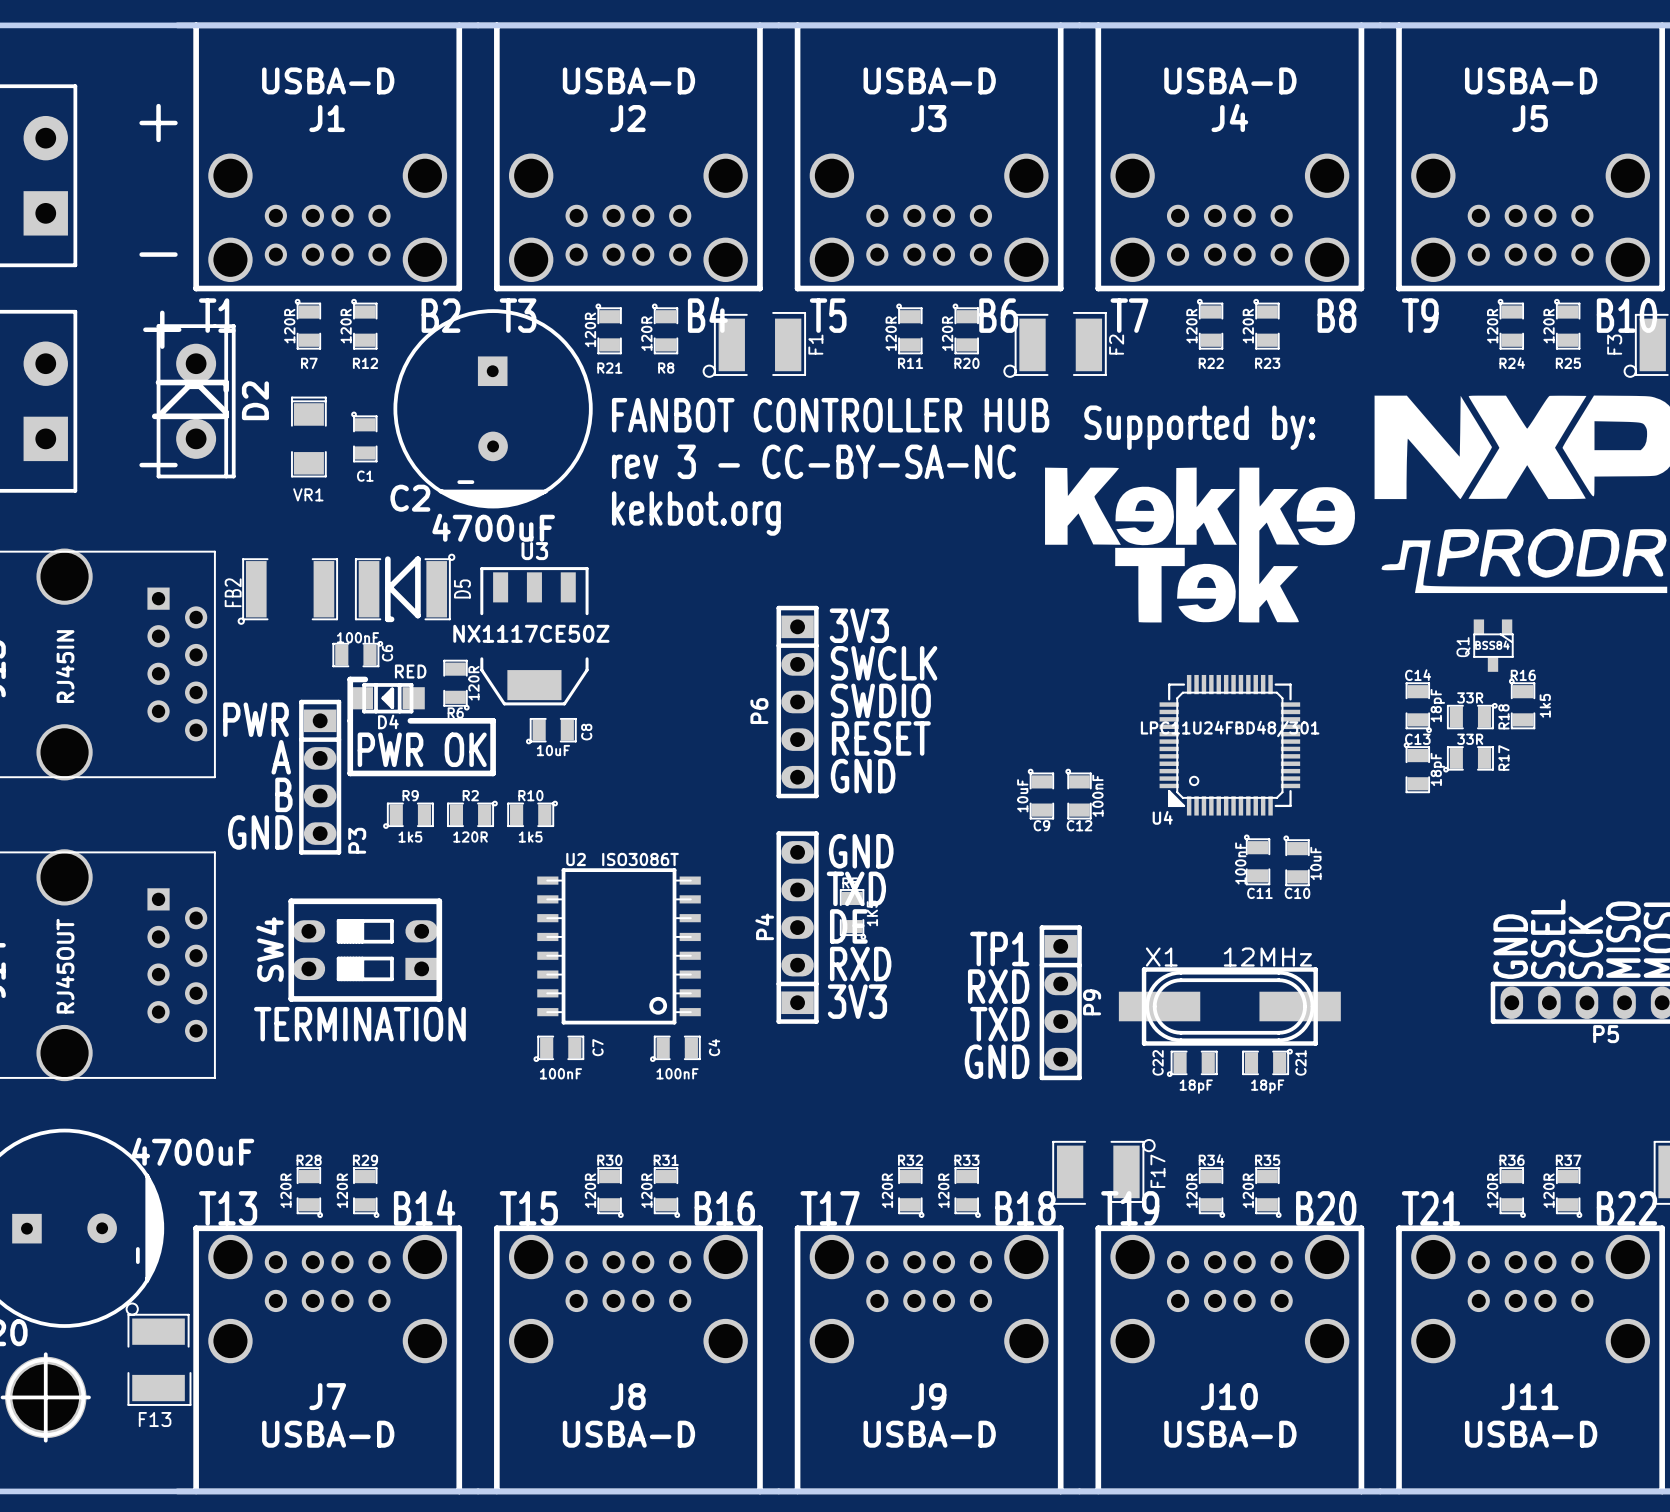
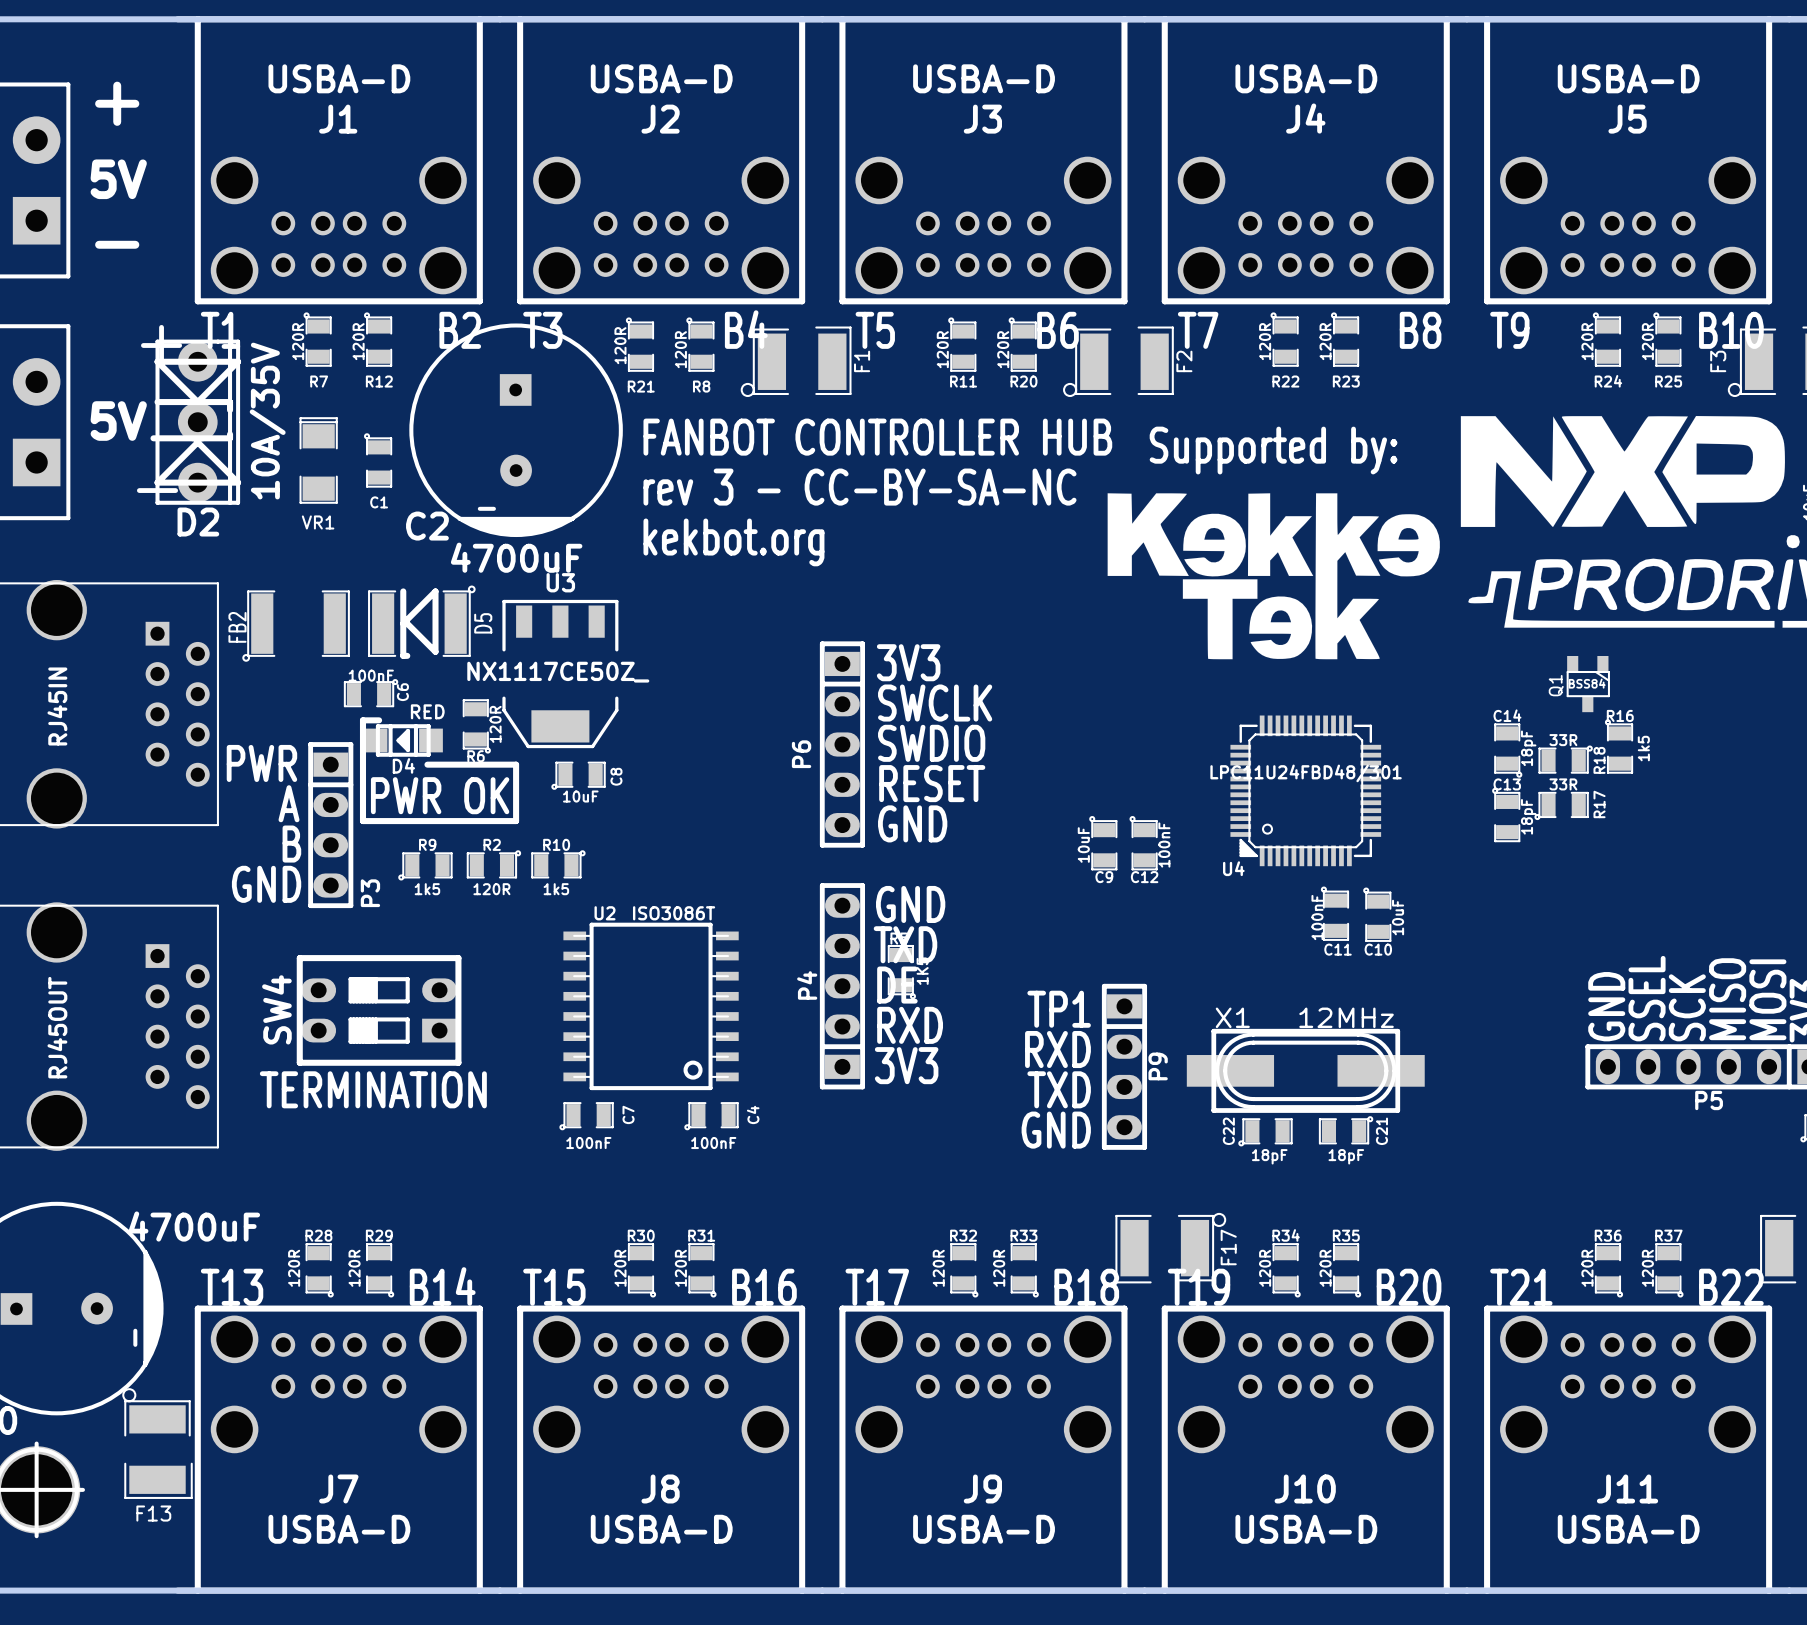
text position: + (158, 123) -> + (117, 103)
text: none -> 5V (118, 179)
text position: - (158, 254) -> - (117, 244)
D2 footprint: [156, 324, 236, 479] -> [155, 339, 241, 505]
line: none -> (157, 361) (197, 402) (238, 361) (157, 361)
text: none -> 5V (118, 421)
D2 name position: D2 (255, 400) -> D2 (198, 522)
D2 value: none -> 10A/35V (267, 421)
line: (226, 412) (199, 386) (188, 386) (158, 416) -> none
line: none -> (197, 442) (238, 482) (157, 482) (197, 442)
U3 value: NX1117CE50Z (531, 633) -> NX1117CE50Z_ (558, 672)

